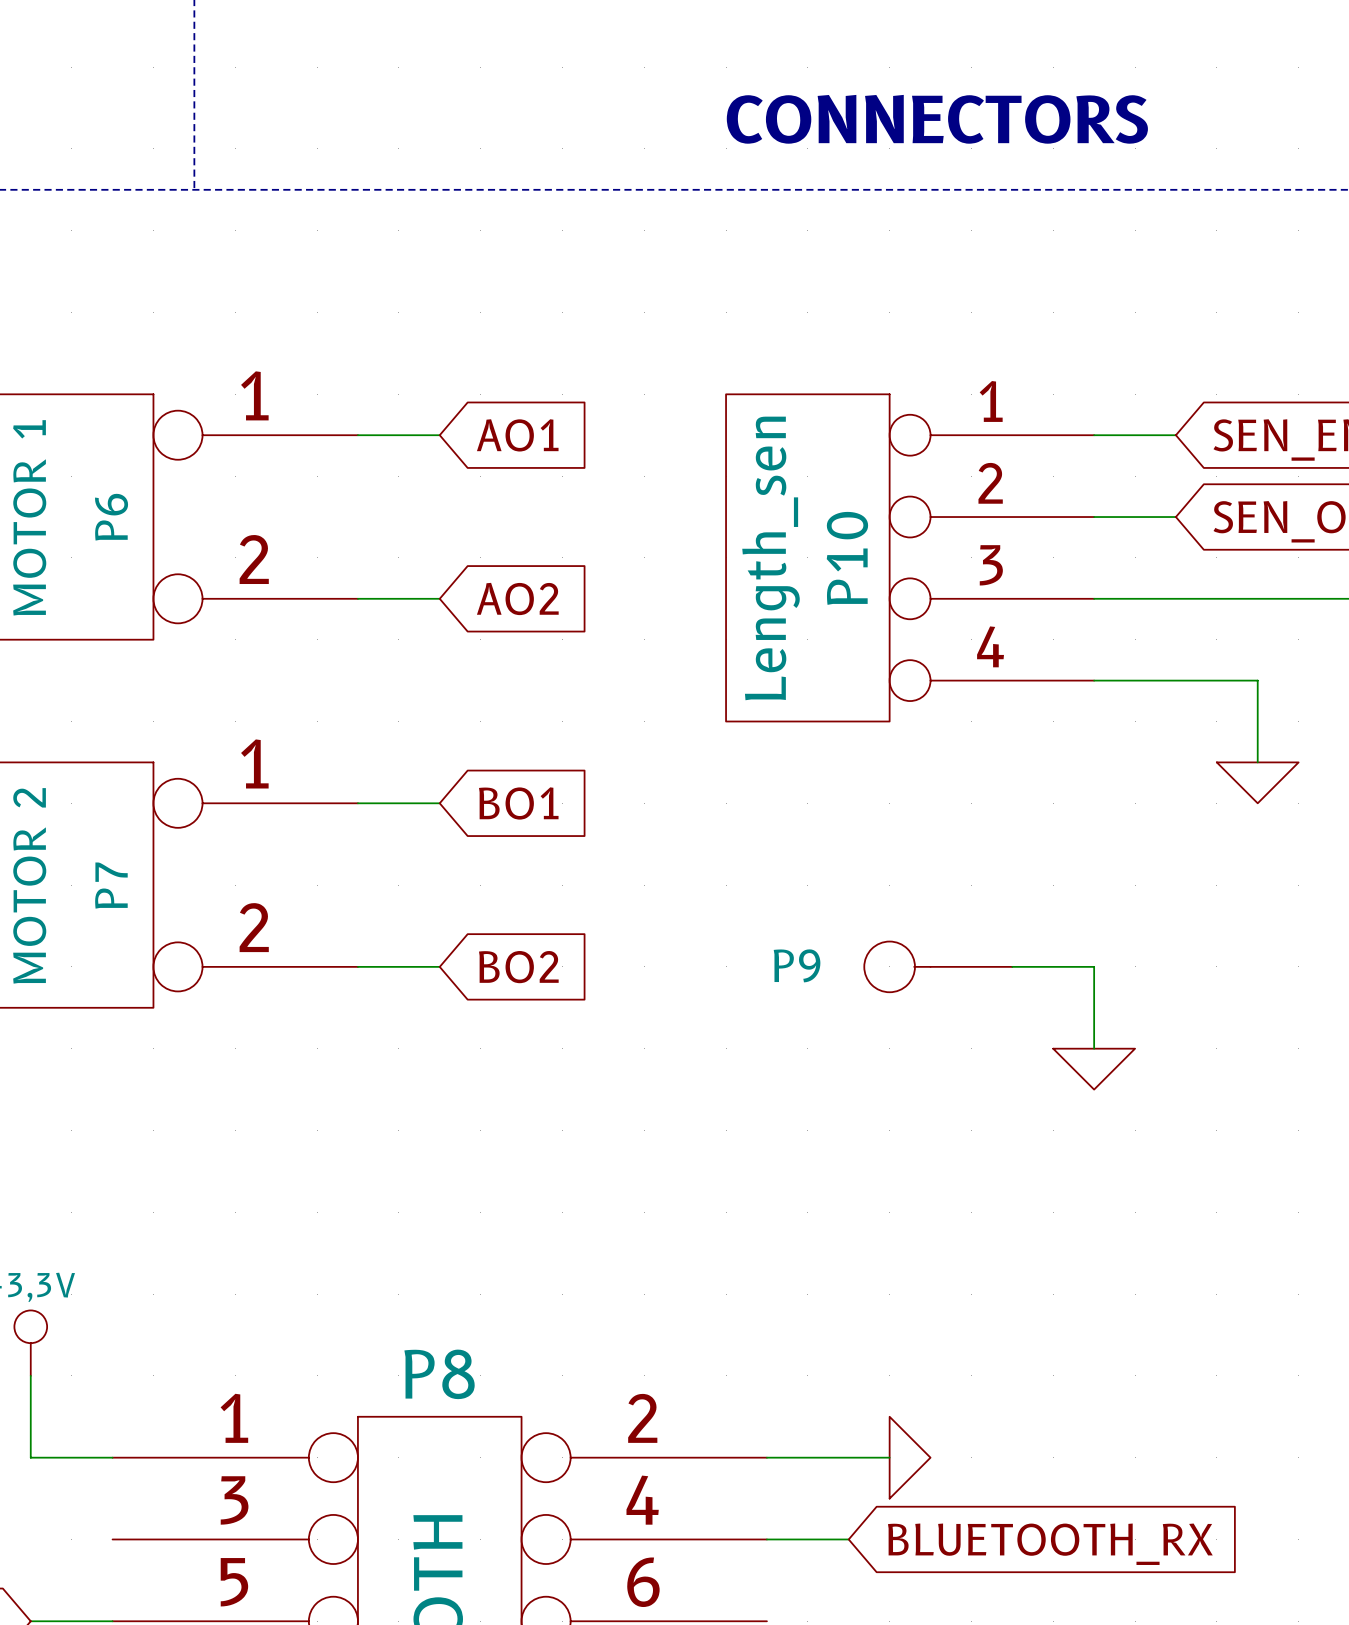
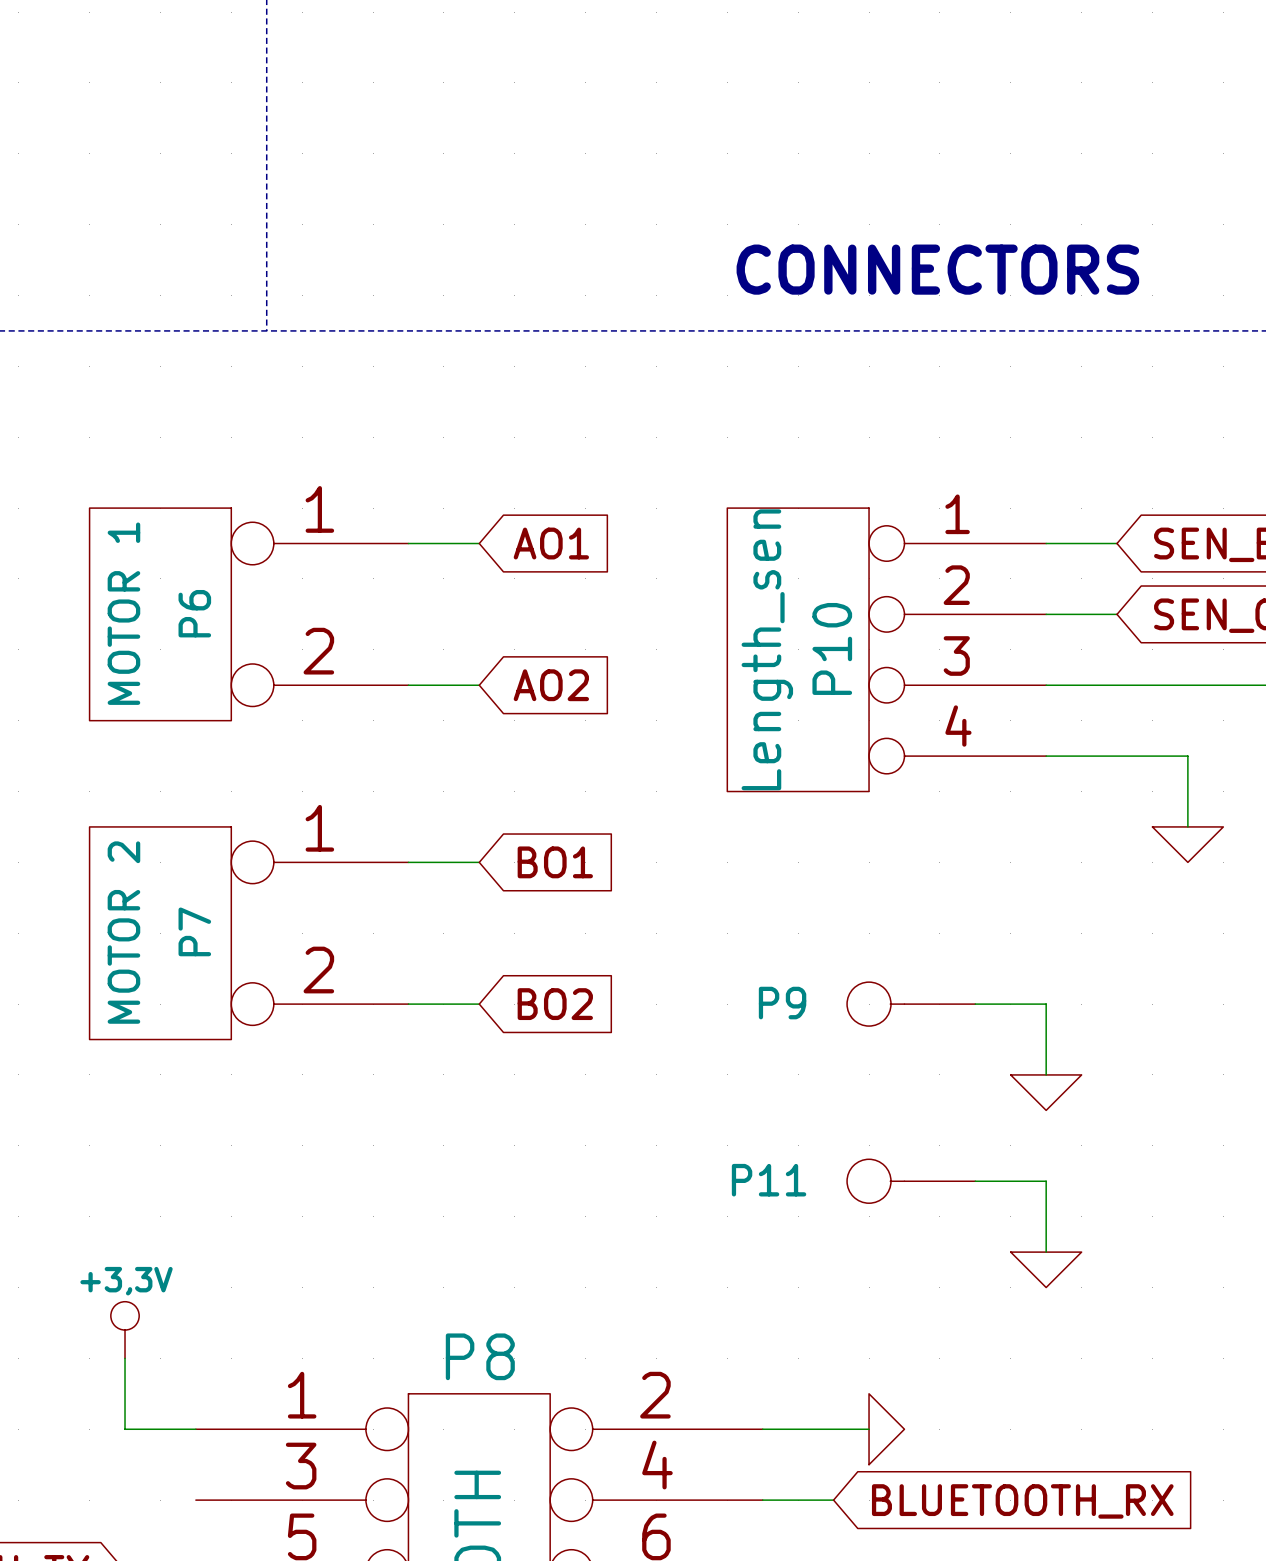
P11: none -> (911, 1181)
wire: none -> (975, 1181) (1046, 1181) (1046, 1252)
power symbol: none -> (1046, 1269)

